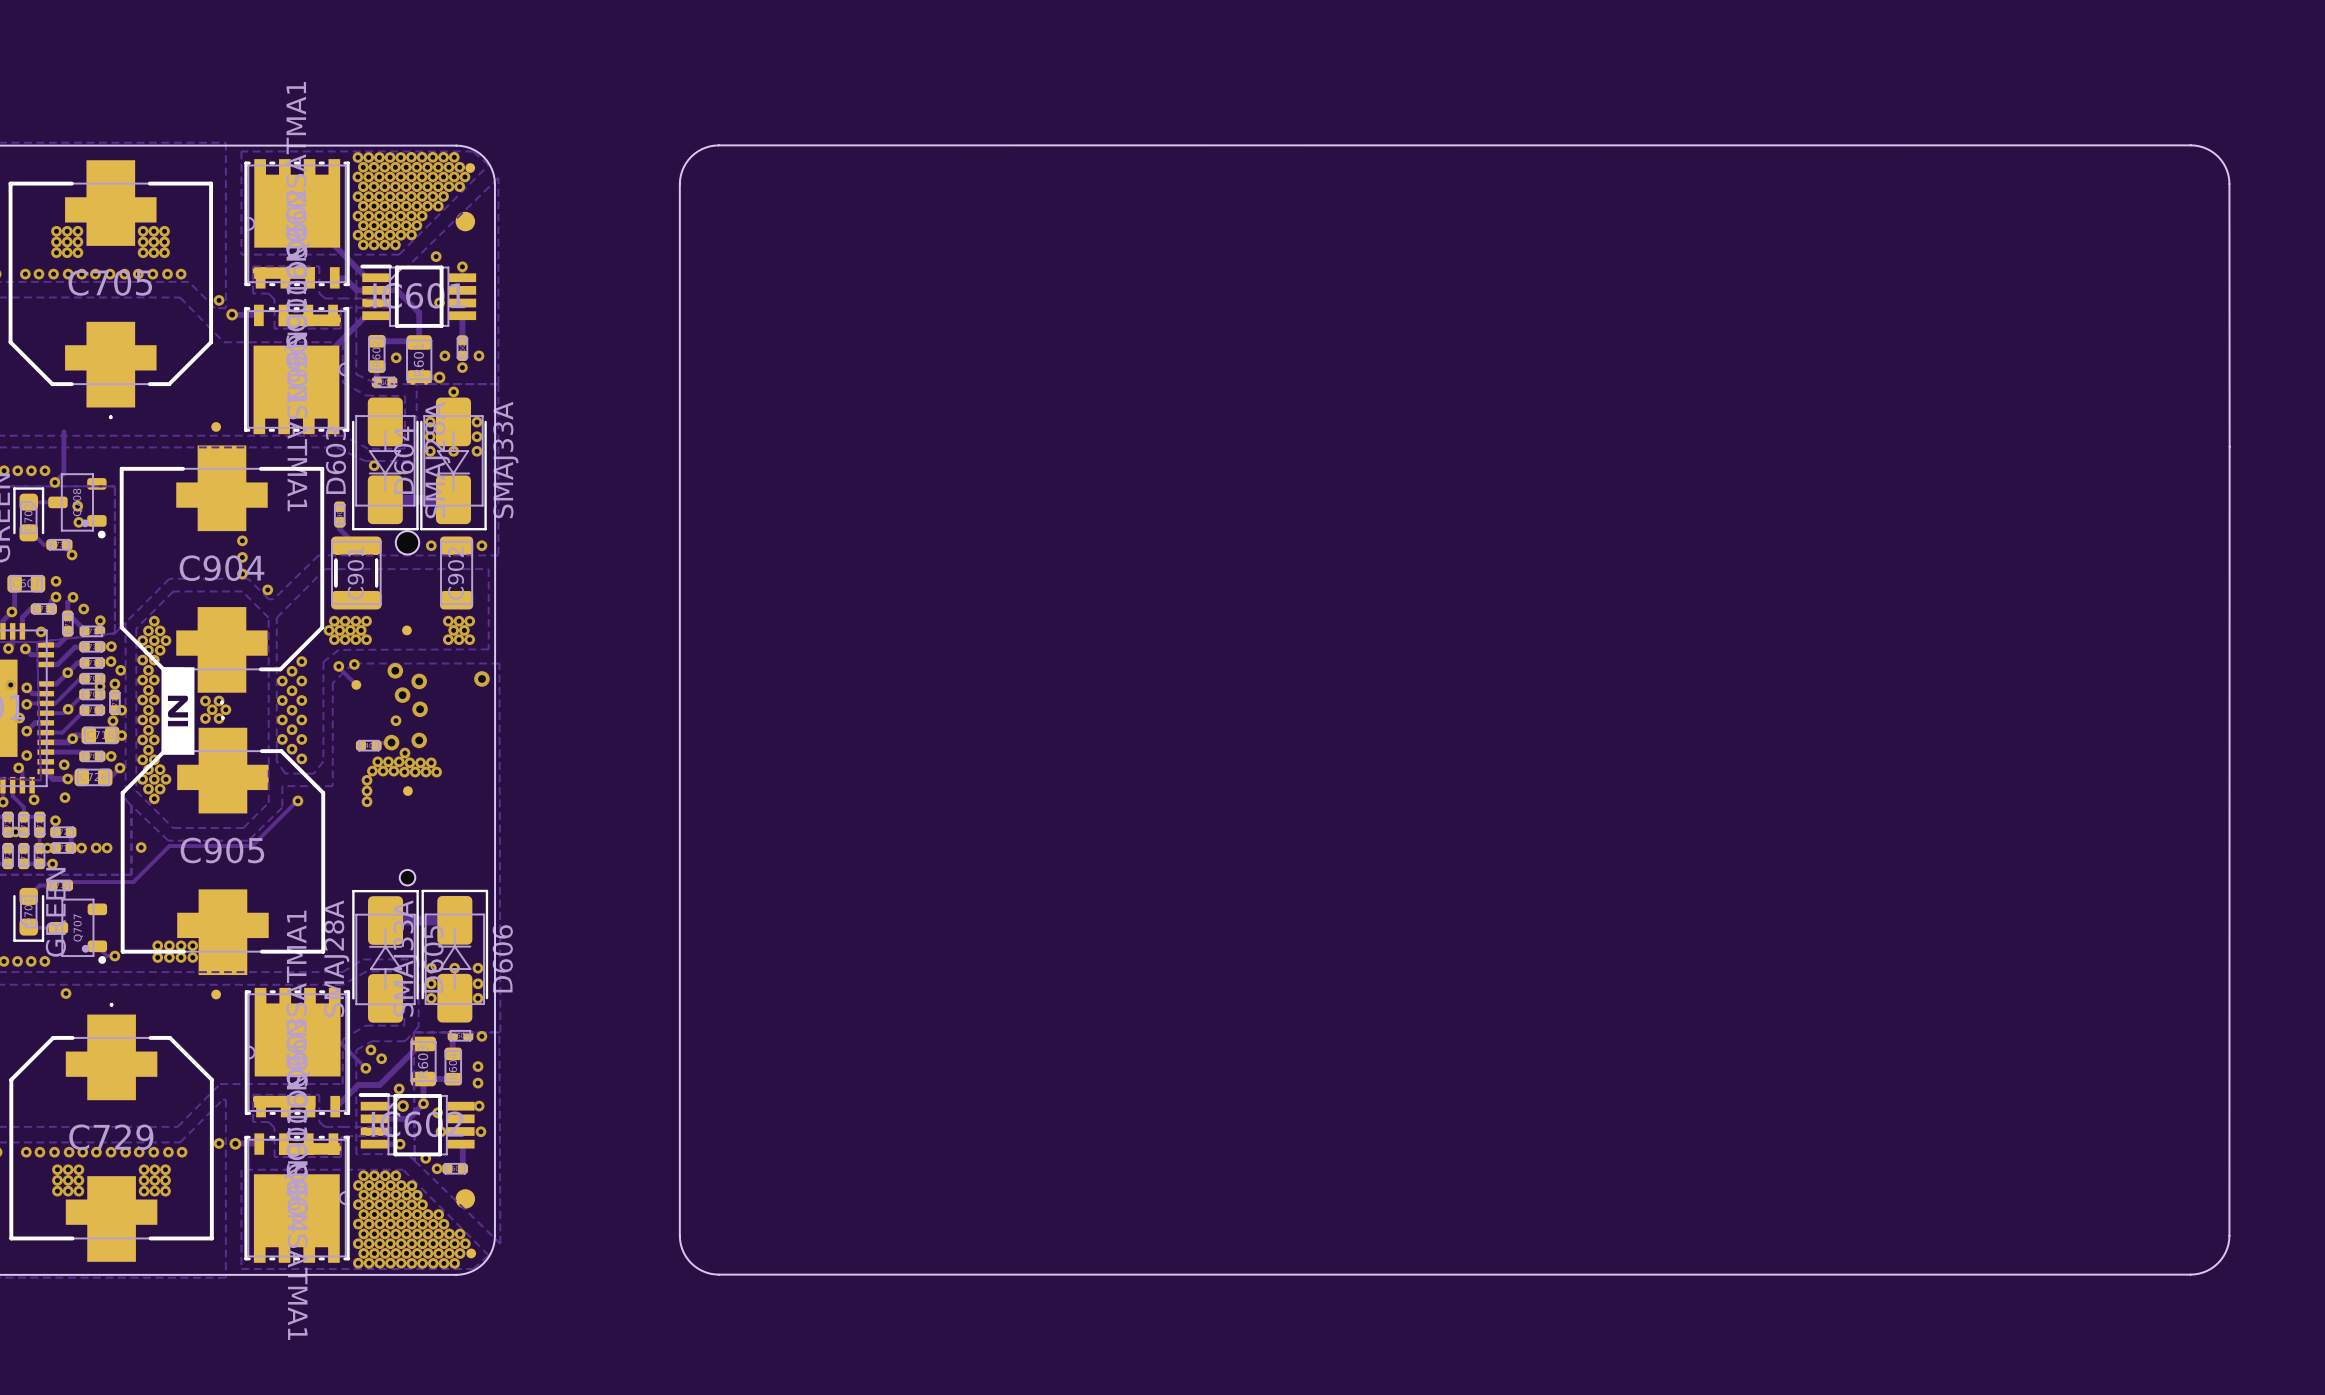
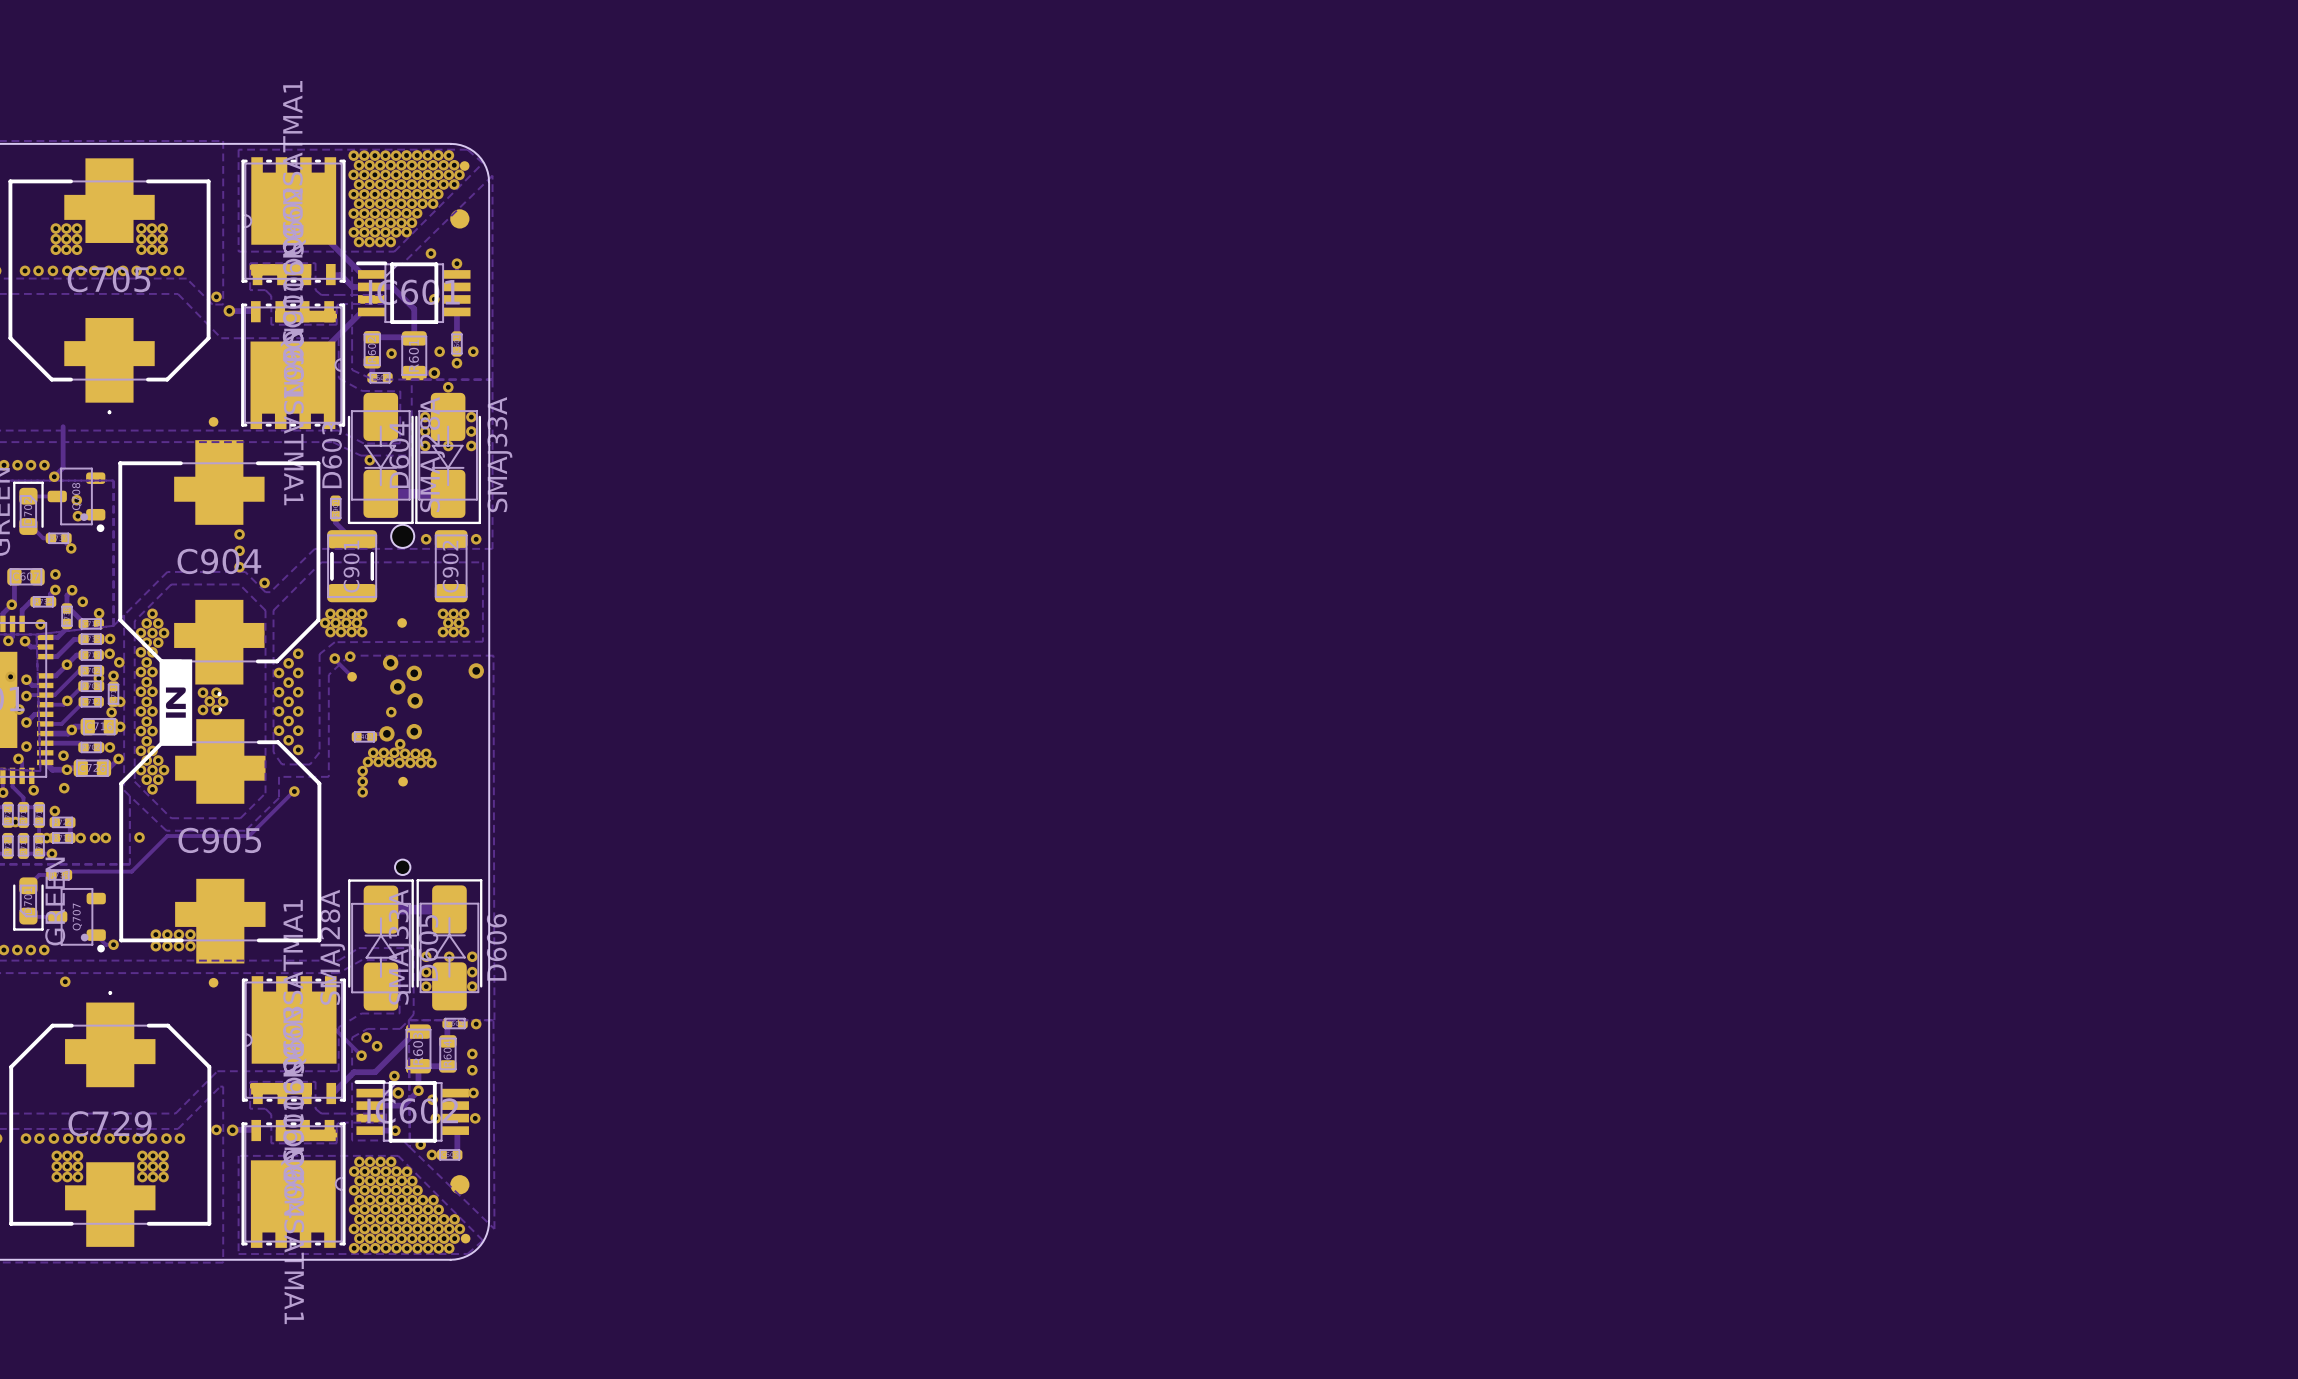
board edge: (718, 145) (2190, 145) (2203, 147) (2214, 153) (2225, 167) (2229, 183) (2229, 1235) (2227, 1248) (2220, 1259) (2207, 1270) (2190, 1274) (718, 1274) (705, 1272) (694, 1266) (683, 1252) (679, 1235) (679, 184) (682, 171) (691, 156) (701, 149) (718, 145) -> none

